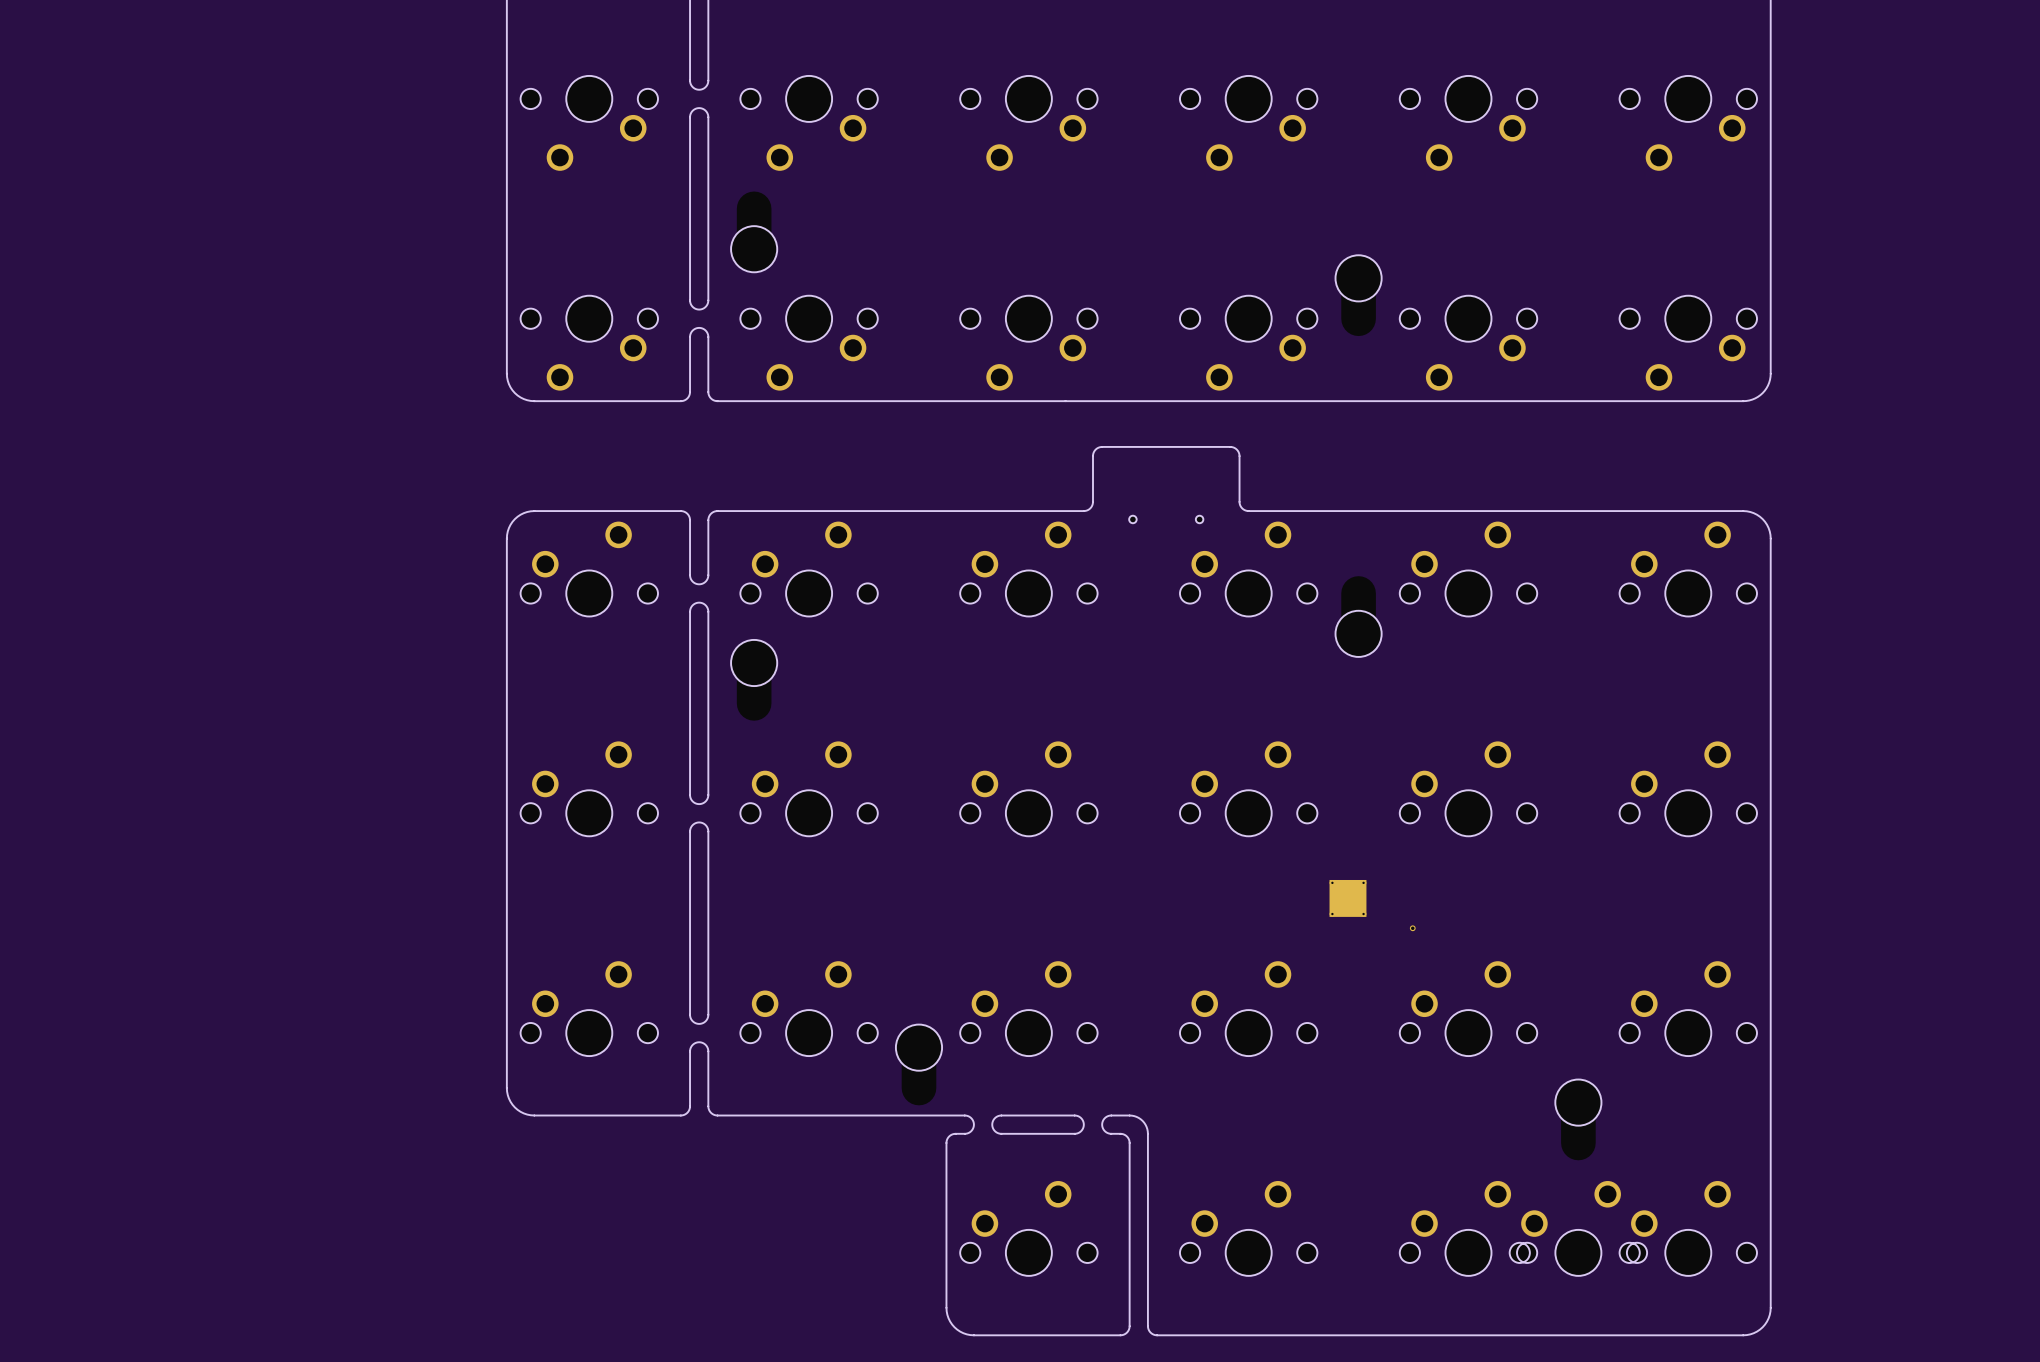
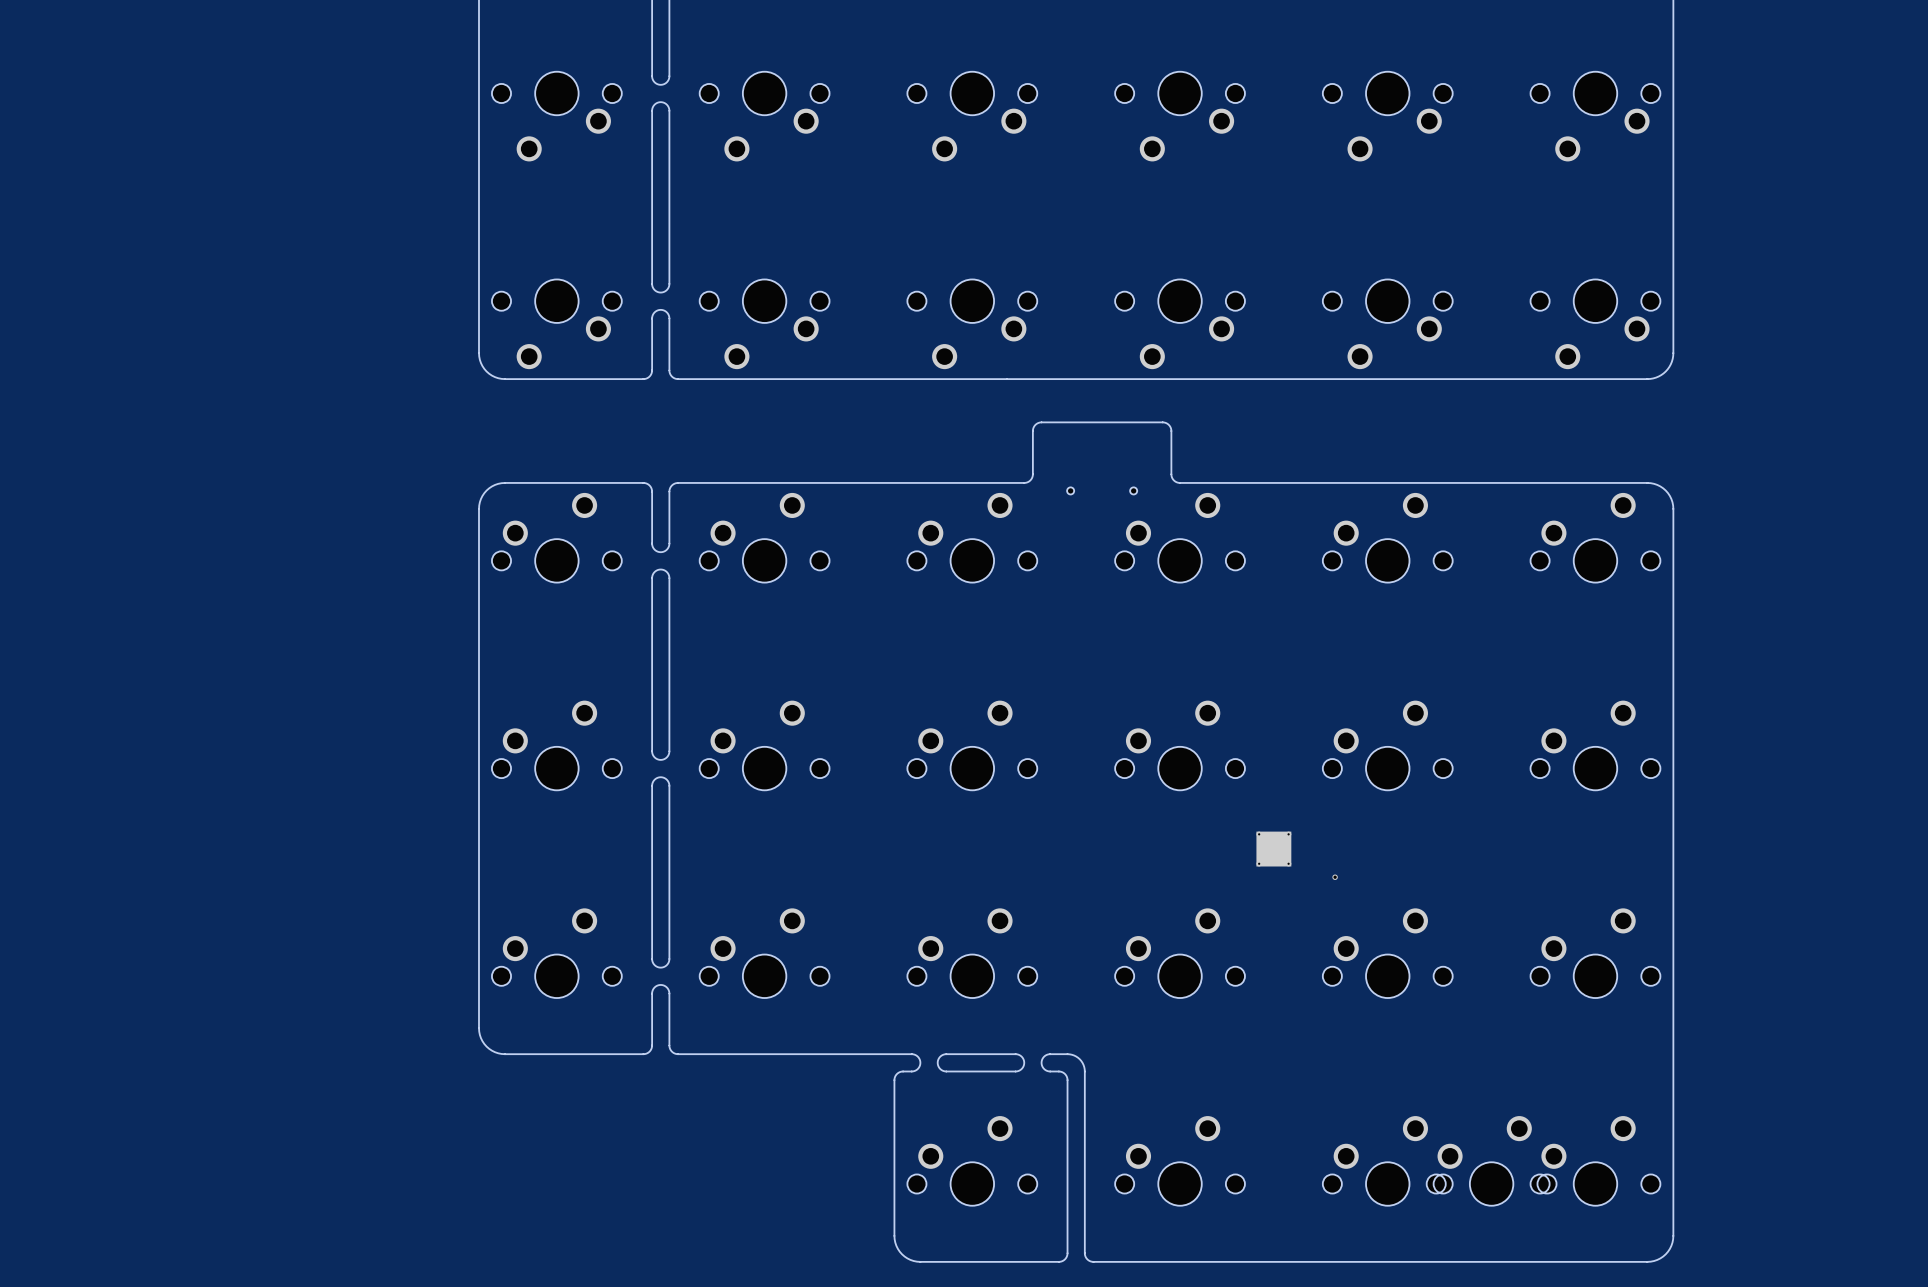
part: (754, 231) -> none
part: (1358, 295) -> none
part: (1358, 616) -> none
part: (754, 680) -> none
part: (918, 1064) -> none
part: (1578, 1119) -> none

